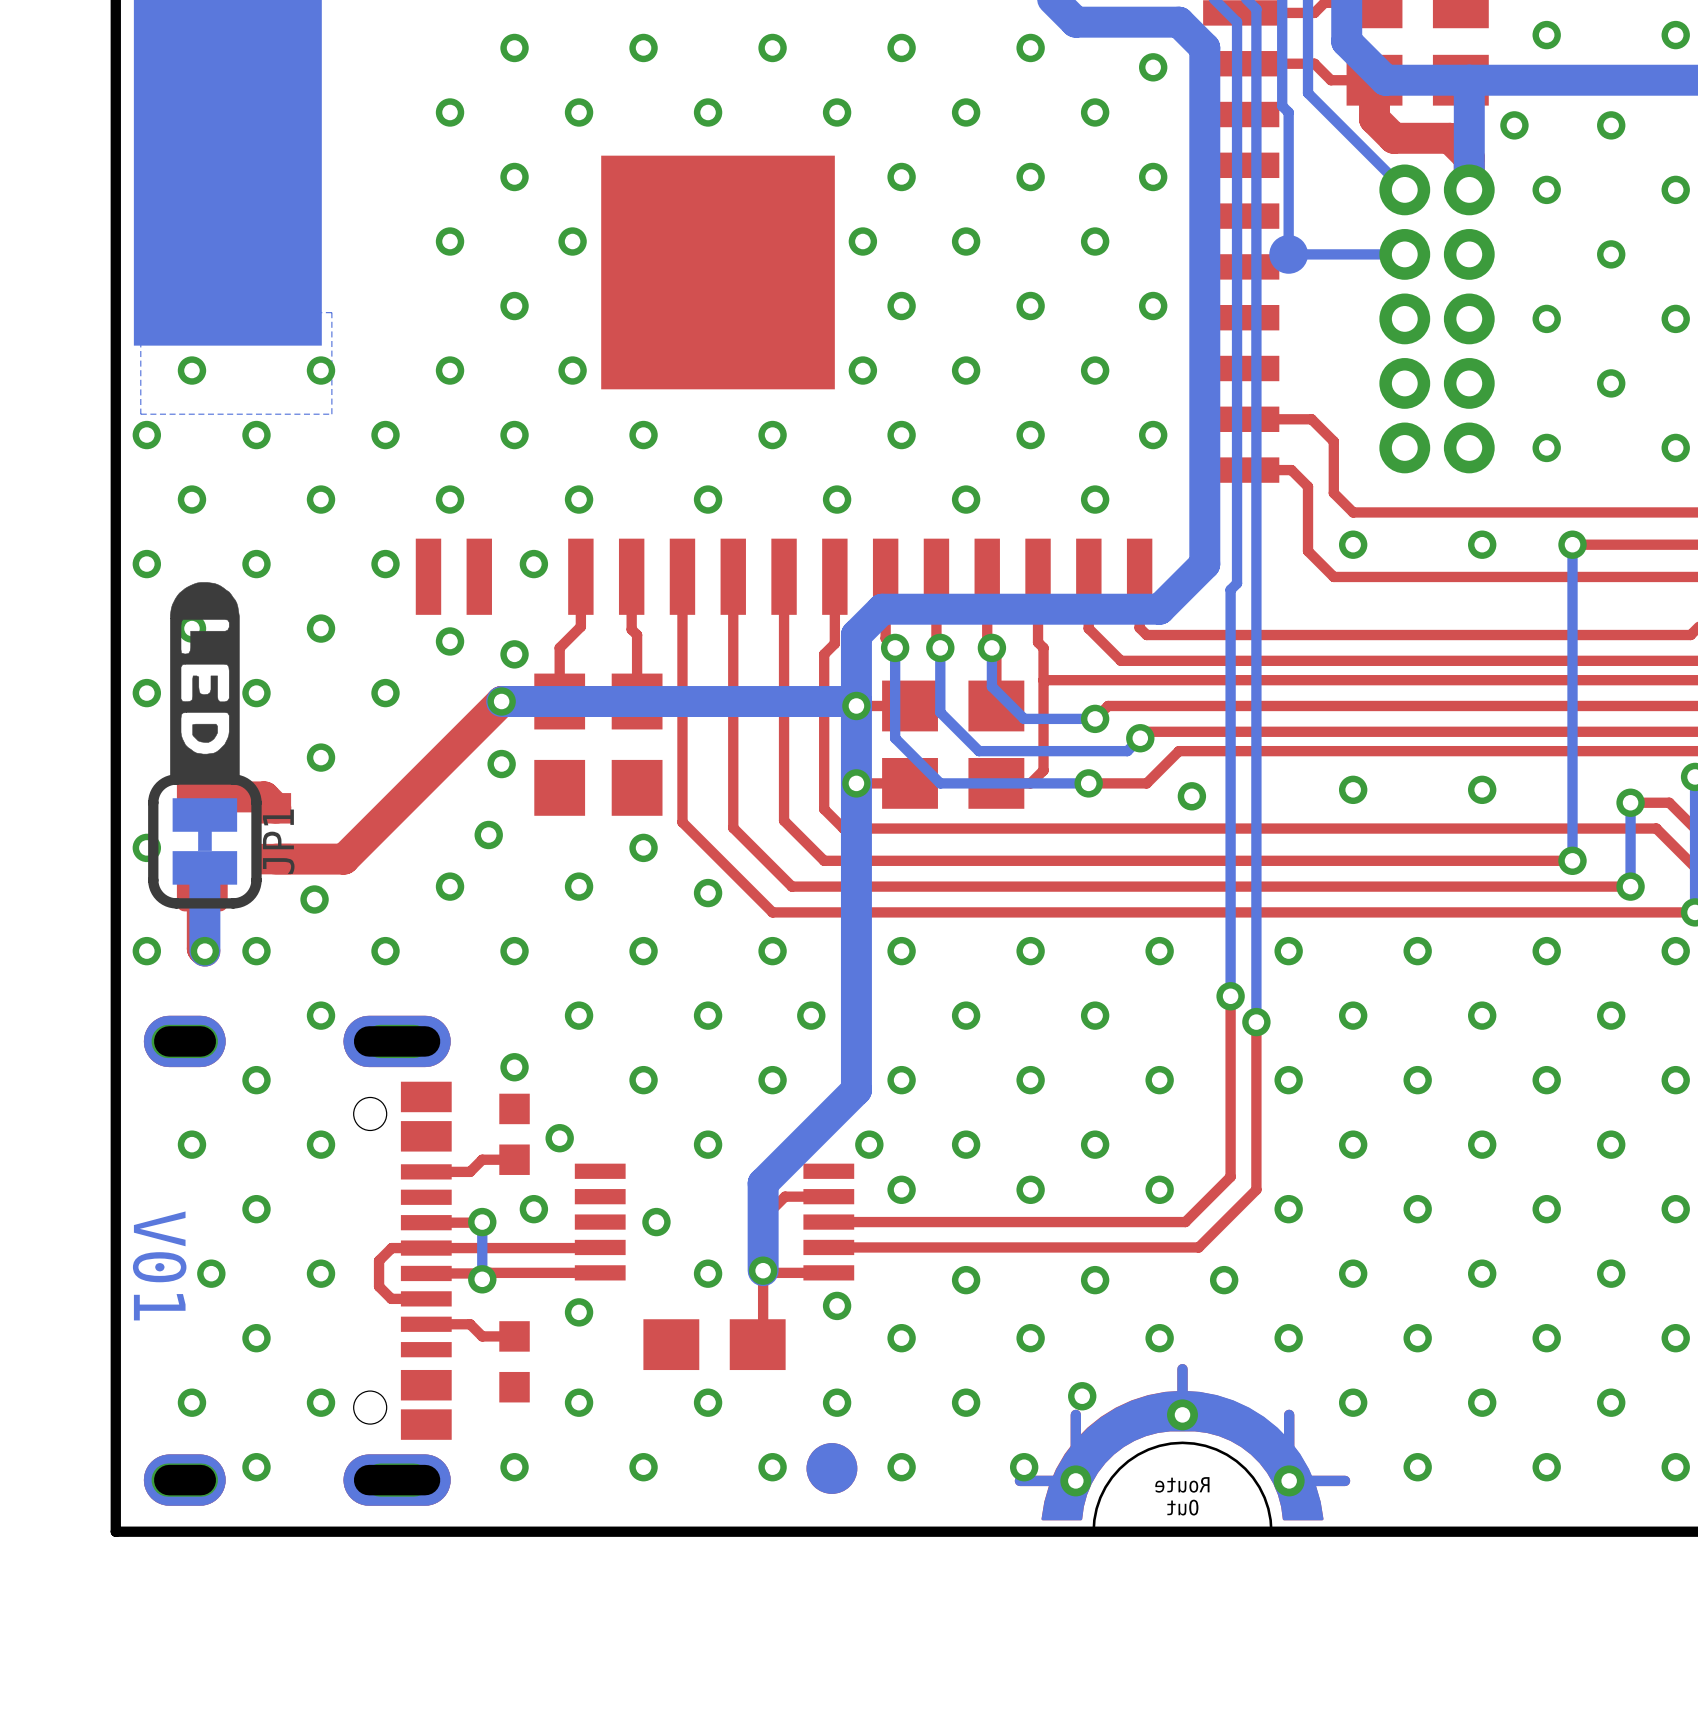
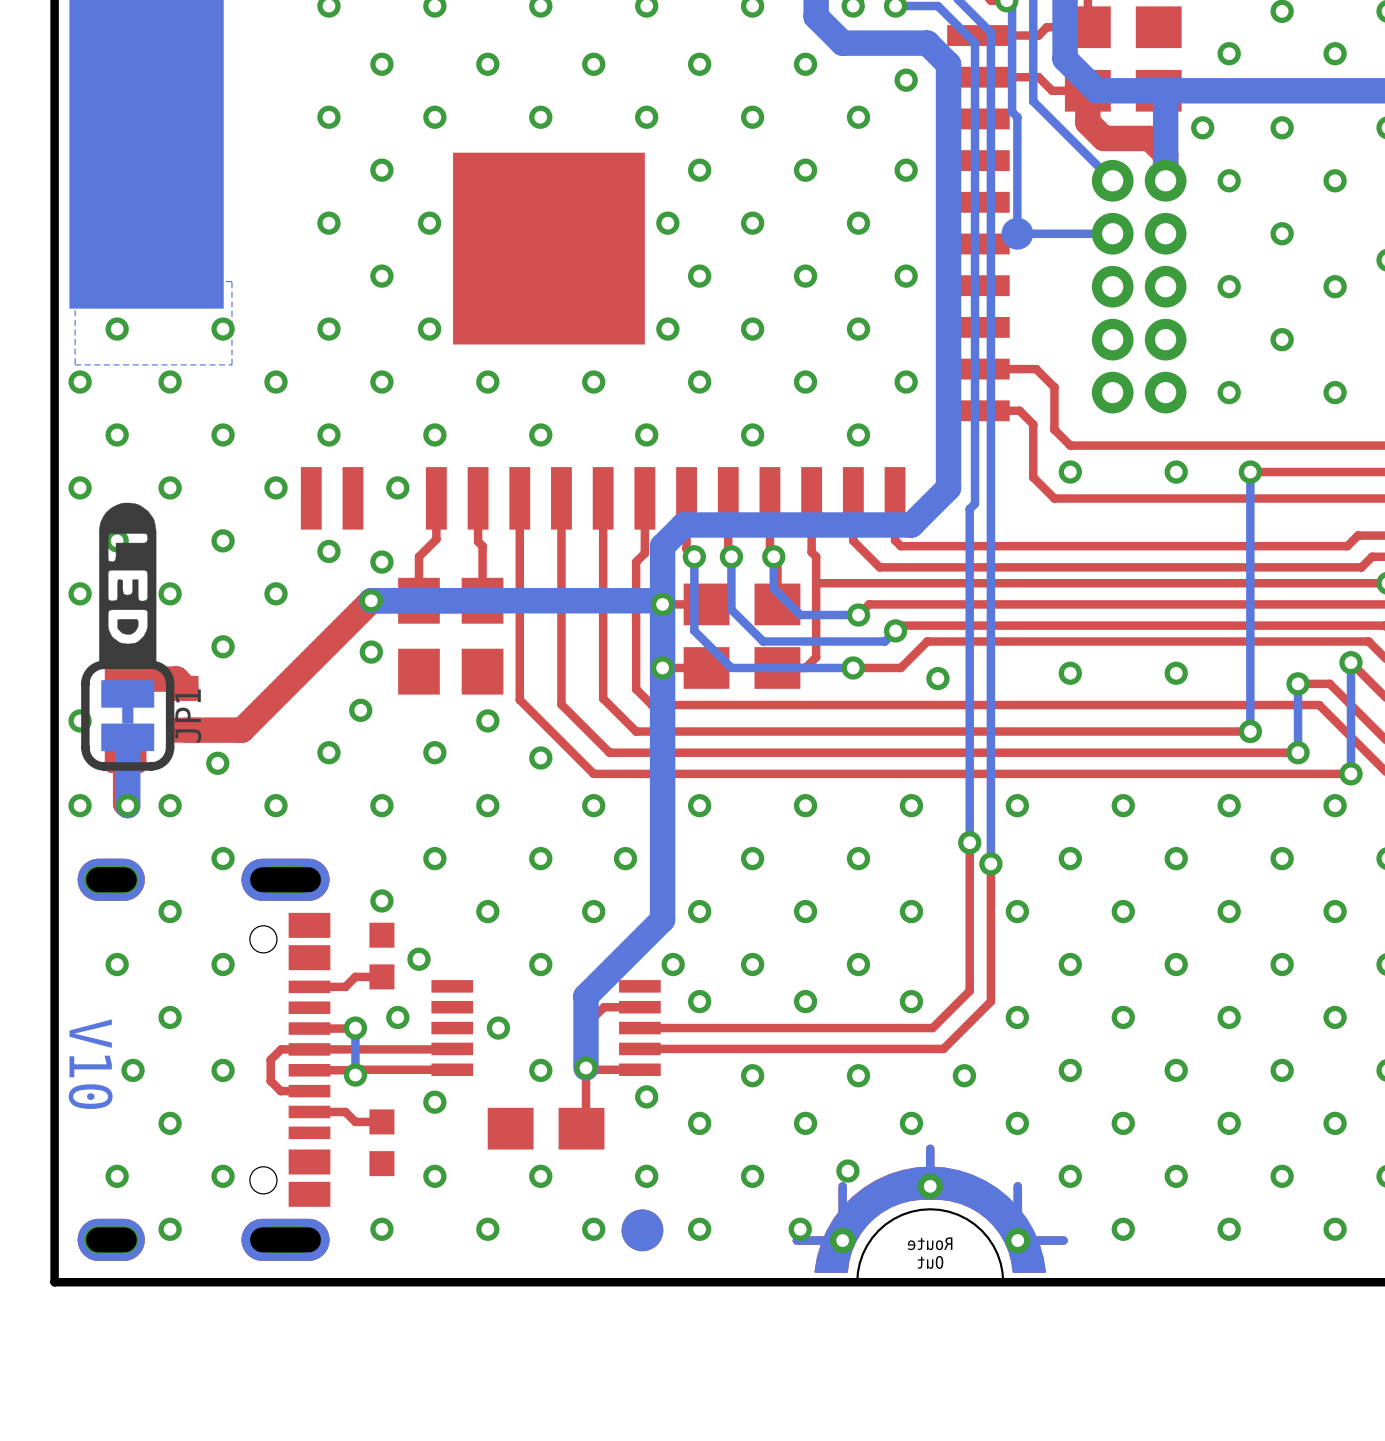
text: V01 (159, 1265) -> V10 (90, 1064)

